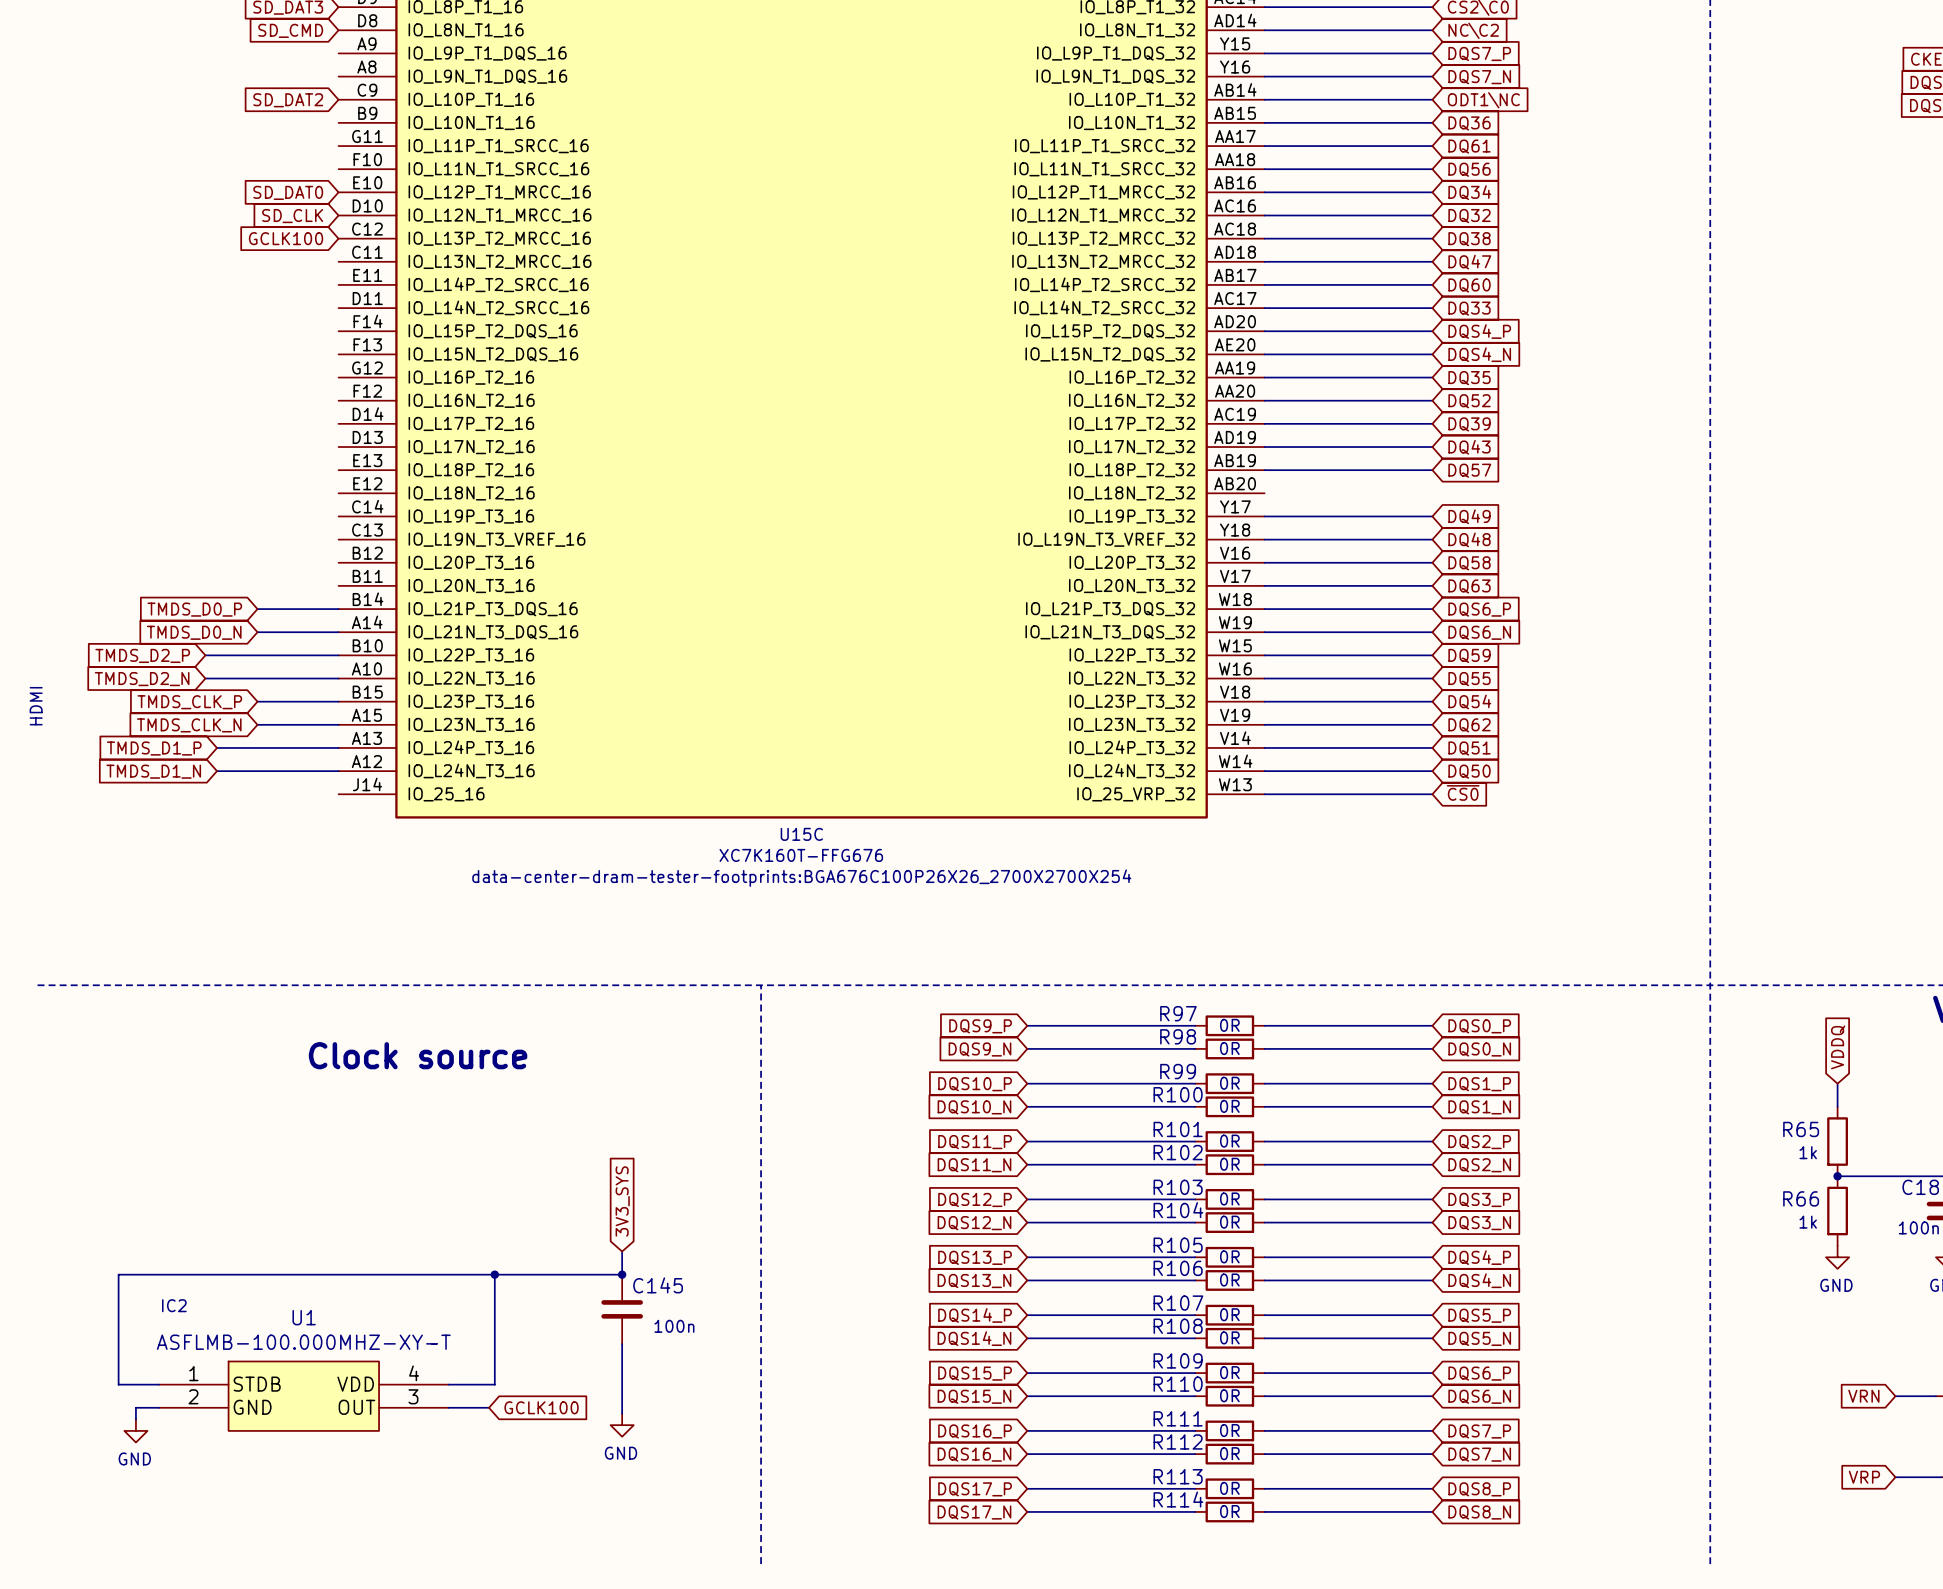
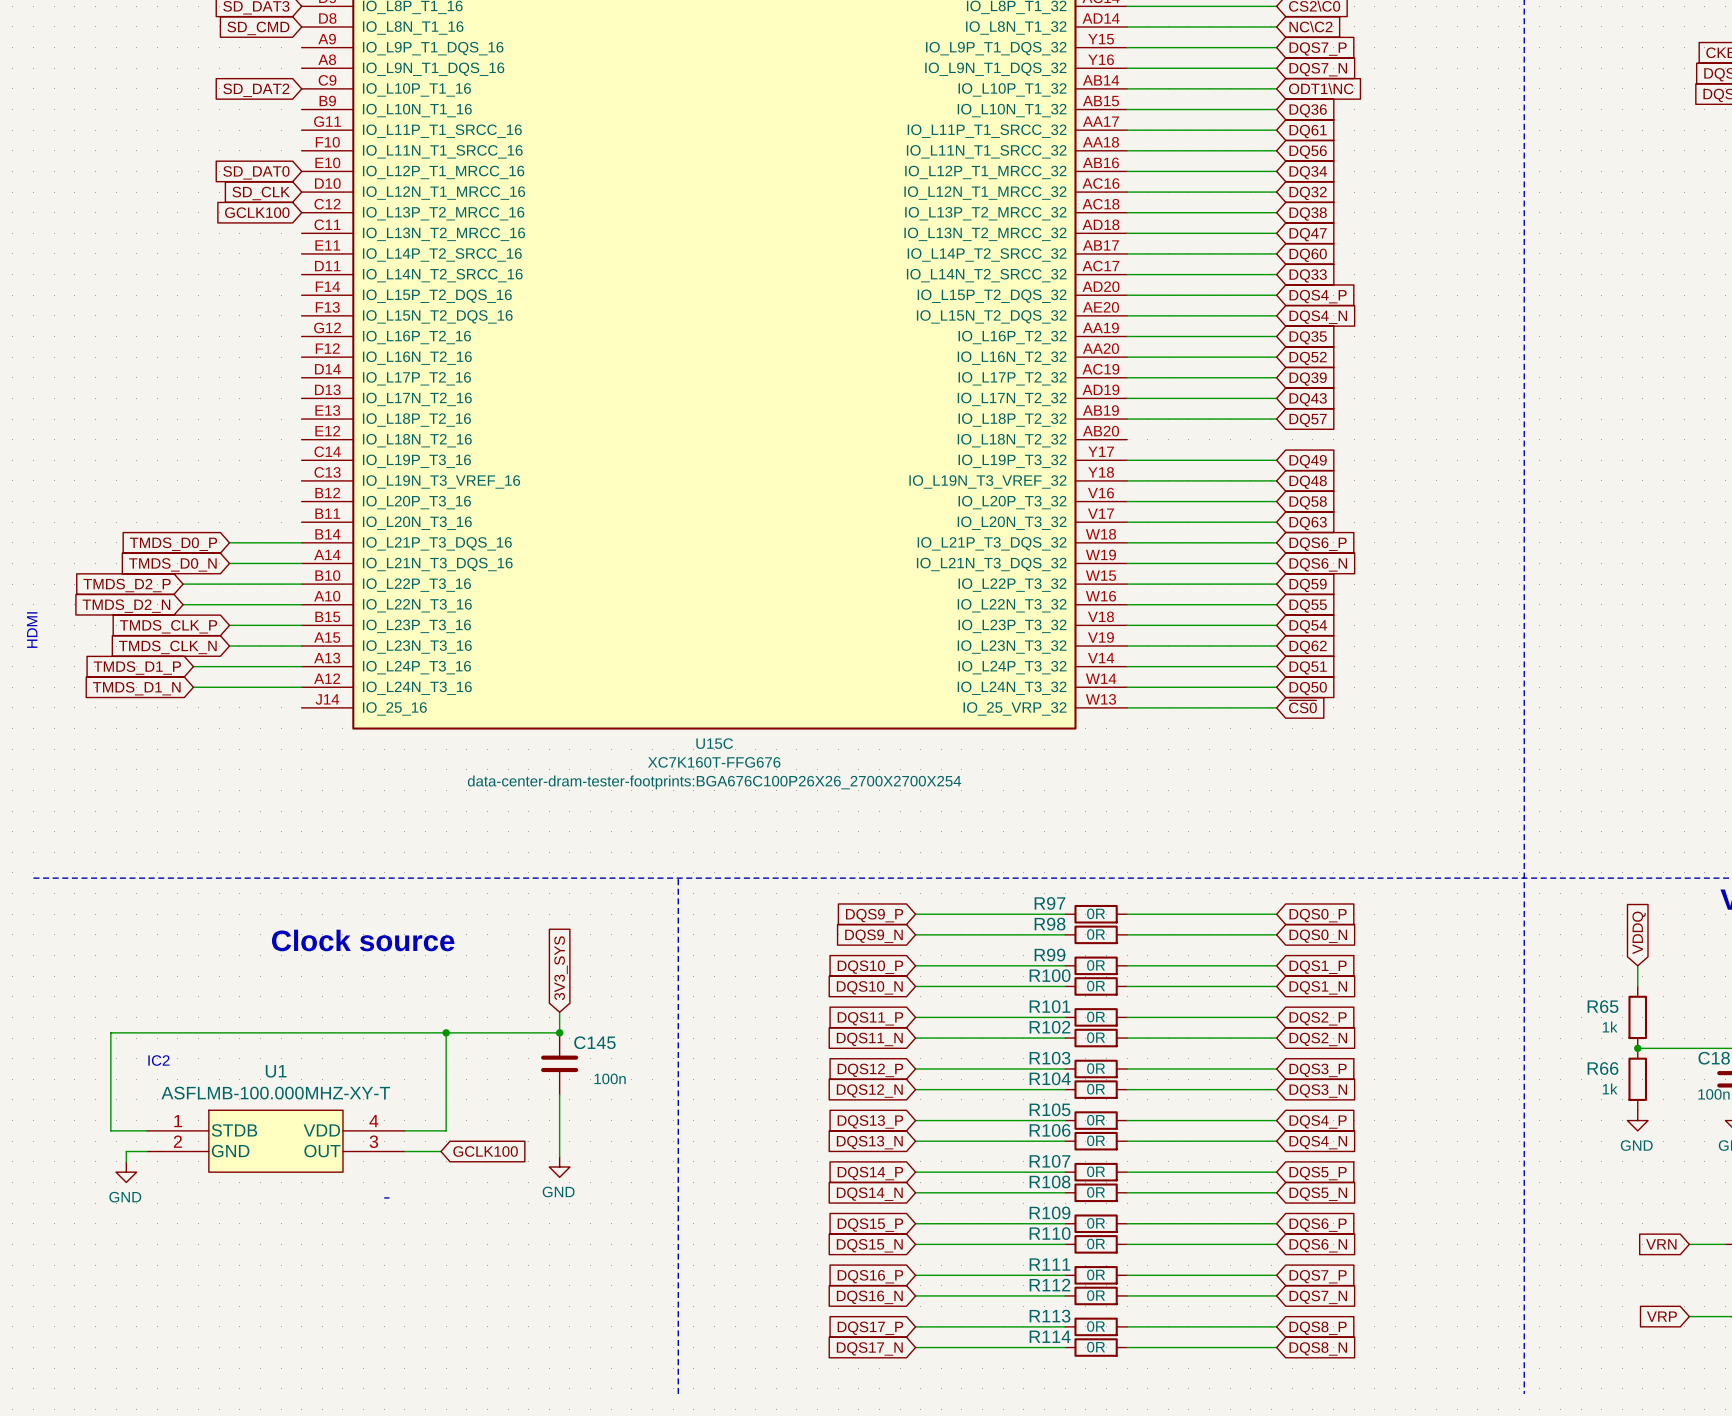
junction: none -> (446, 1032)
junction: none -> (559, 1032)
global label position: 3V3_SYS (622, 1201) -> 3V3_SYS (561, 968)
wire: (622, 1251) (622, 1274) (118, 1274) (118, 1384) (159, 1384) -> (559, 1012) (559, 1032) (110, 1032) (110, 1130) (146, 1130)
wire: (494, 1274) (494, 1384) (448, 1384) -> (446, 1032) (446, 1130) (404, 1130)
junction: (494, 1274) -> none
junction: (622, 1274) -> none
text position: IC2 (174, 1305) -> IC2 (158, 1060)
C145 position: (622, 1309) -> (559, 1063)
wire: (622, 1344) (622, 1413) -> (559, 1094) (559, 1156)
U1 position: (303, 1396) -> (275, 1141)
wire: (159, 1407) (135, 1407) (135, 1419) -> (146, 1151) (126, 1151) (126, 1161)
wire: (448, 1407) (489, 1407) -> (404, 1151) (440, 1151)
global label position: GCLK100 (541, 1407) -> GCLK100 (485, 1151)
power symbol position: GND (622, 1425) -> GND (559, 1167)
power symbol position: GND (135, 1430) -> GND (126, 1172)

